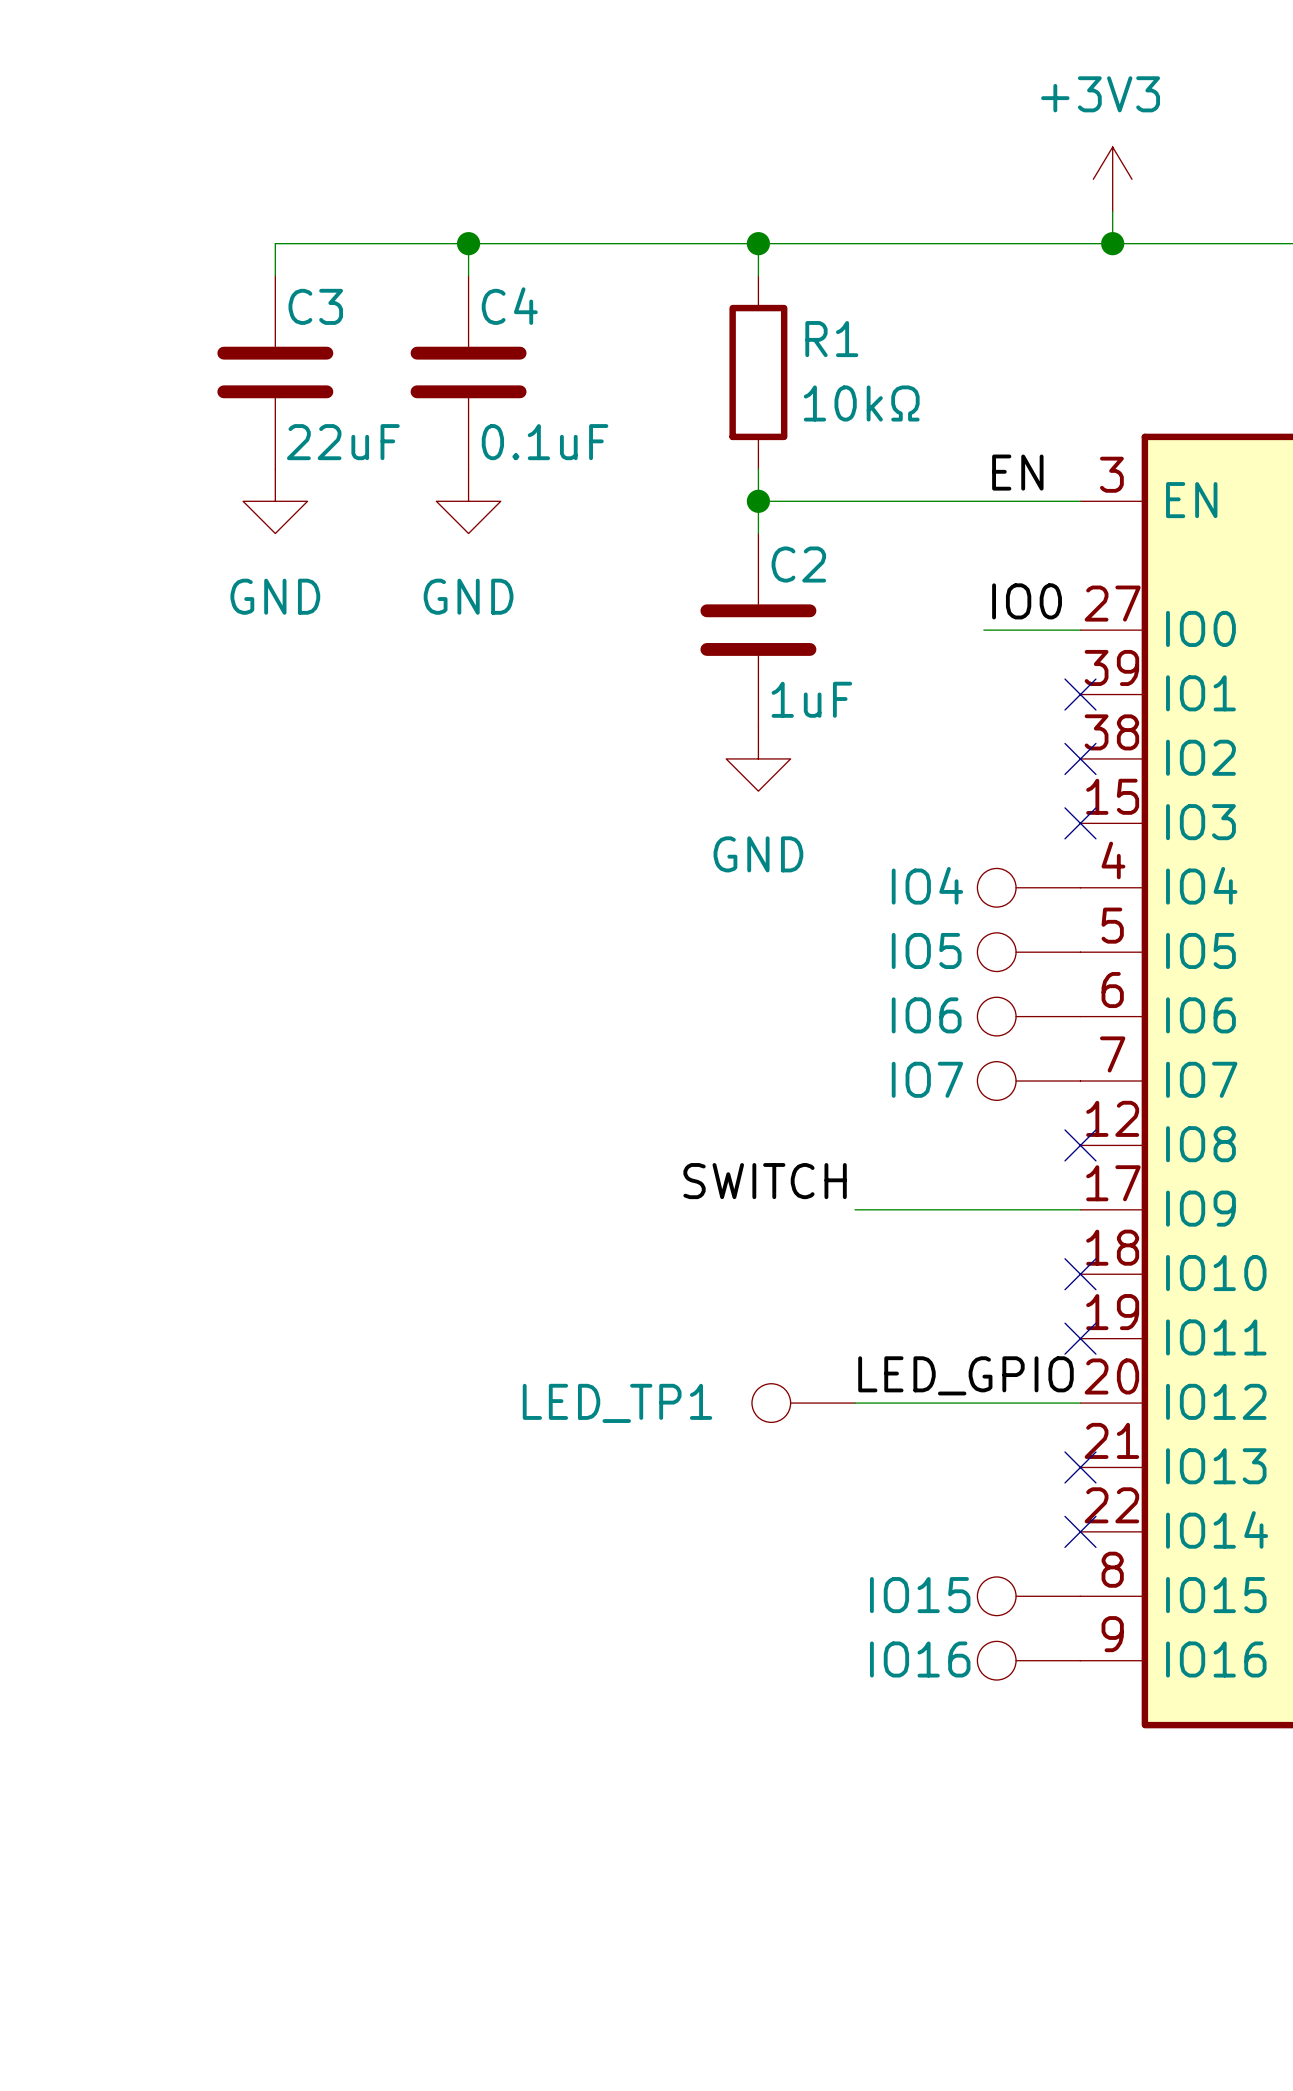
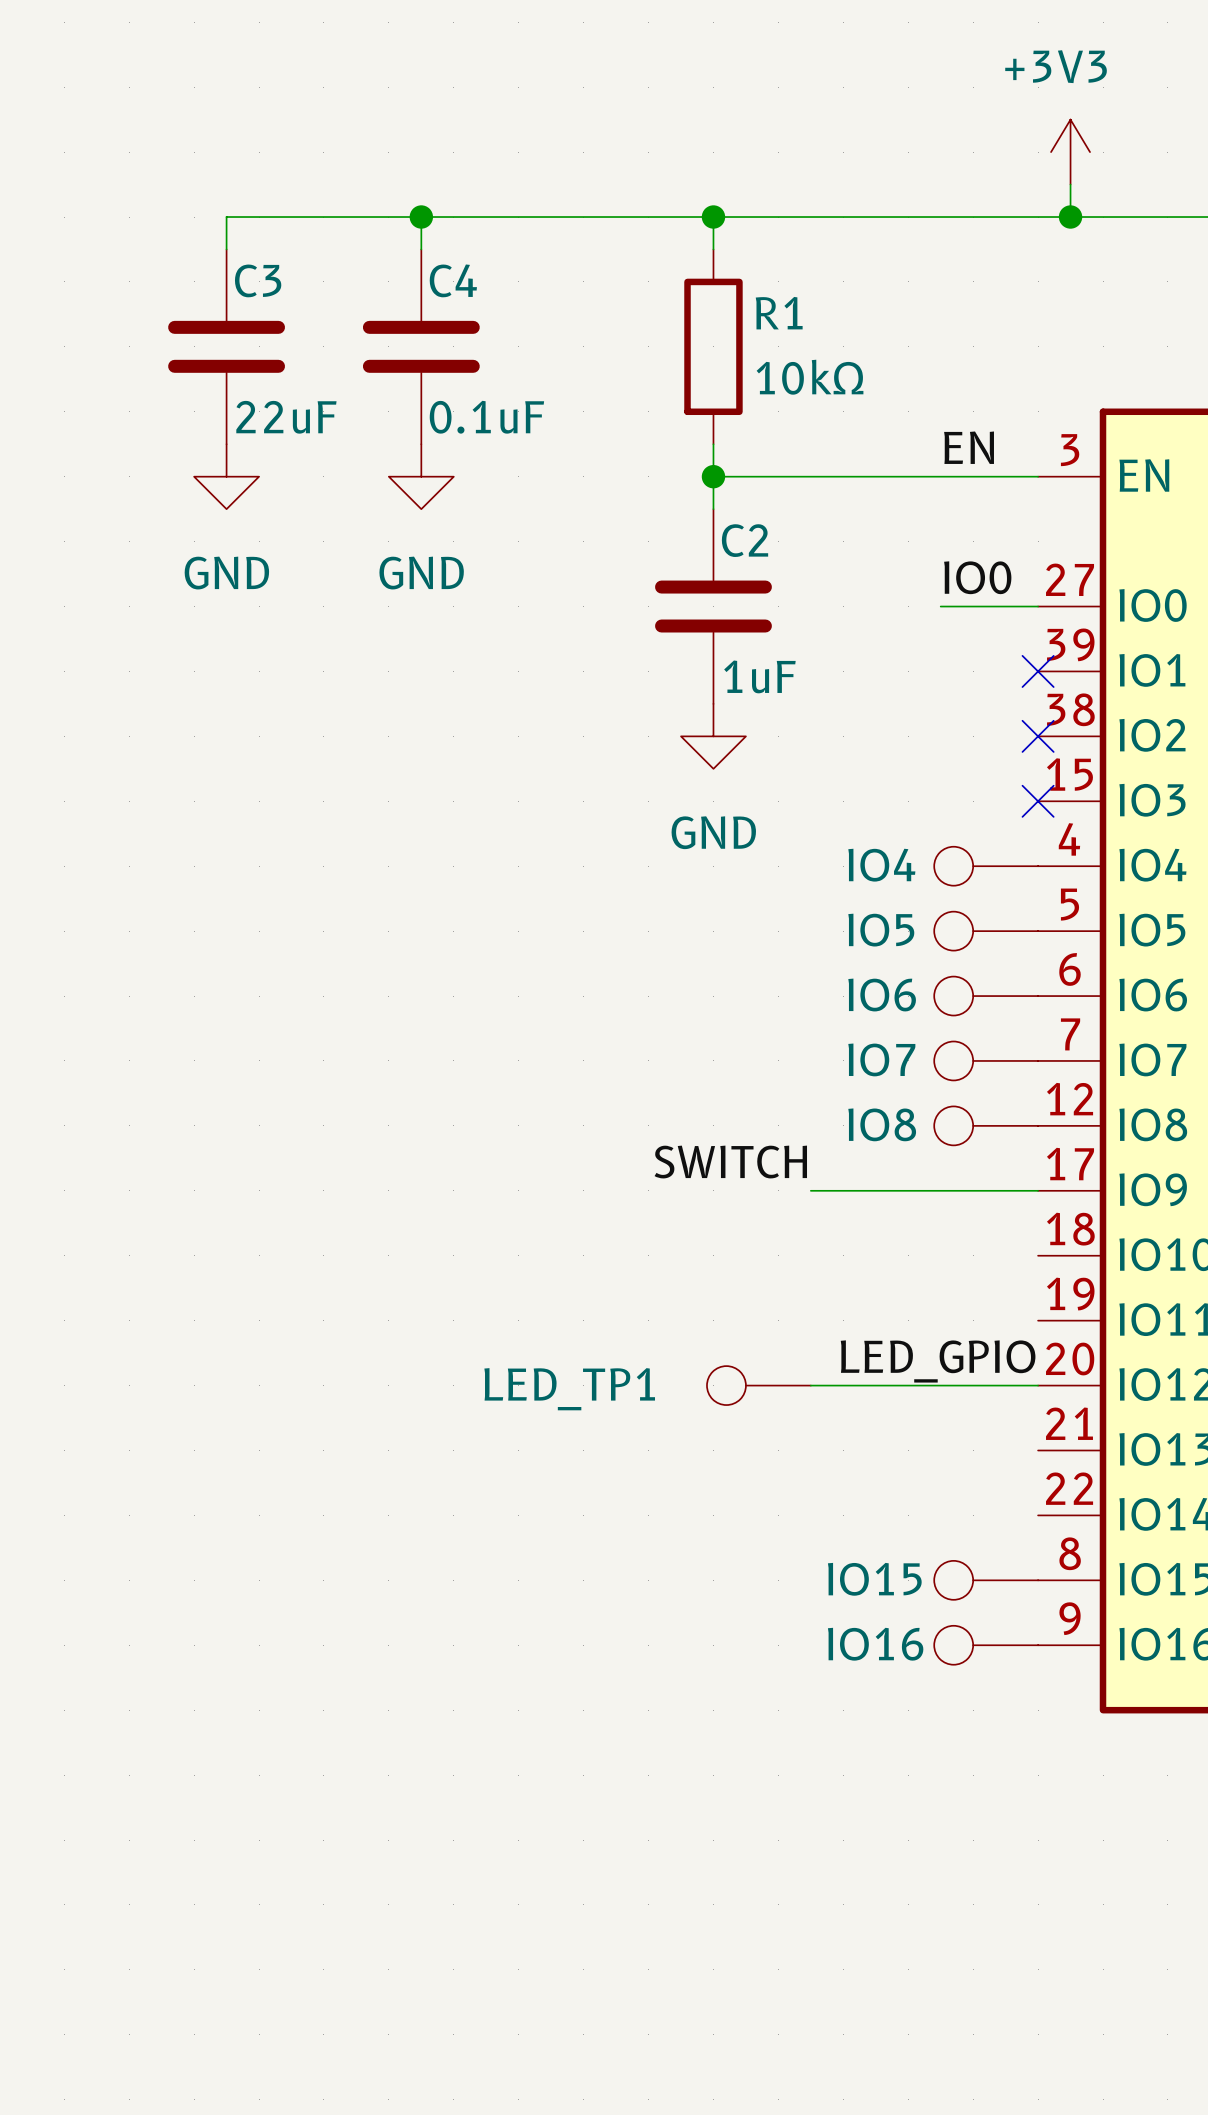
IO8: none -> (986, 1125)
no-connect mark: (1080, 1145) -> none
no-connect mark: (1080, 1274) -> none
no-connect mark: (1080, 1338) -> none
no-connect mark: (1080, 1467) -> none
no-connect mark: (1080, 1531) -> none

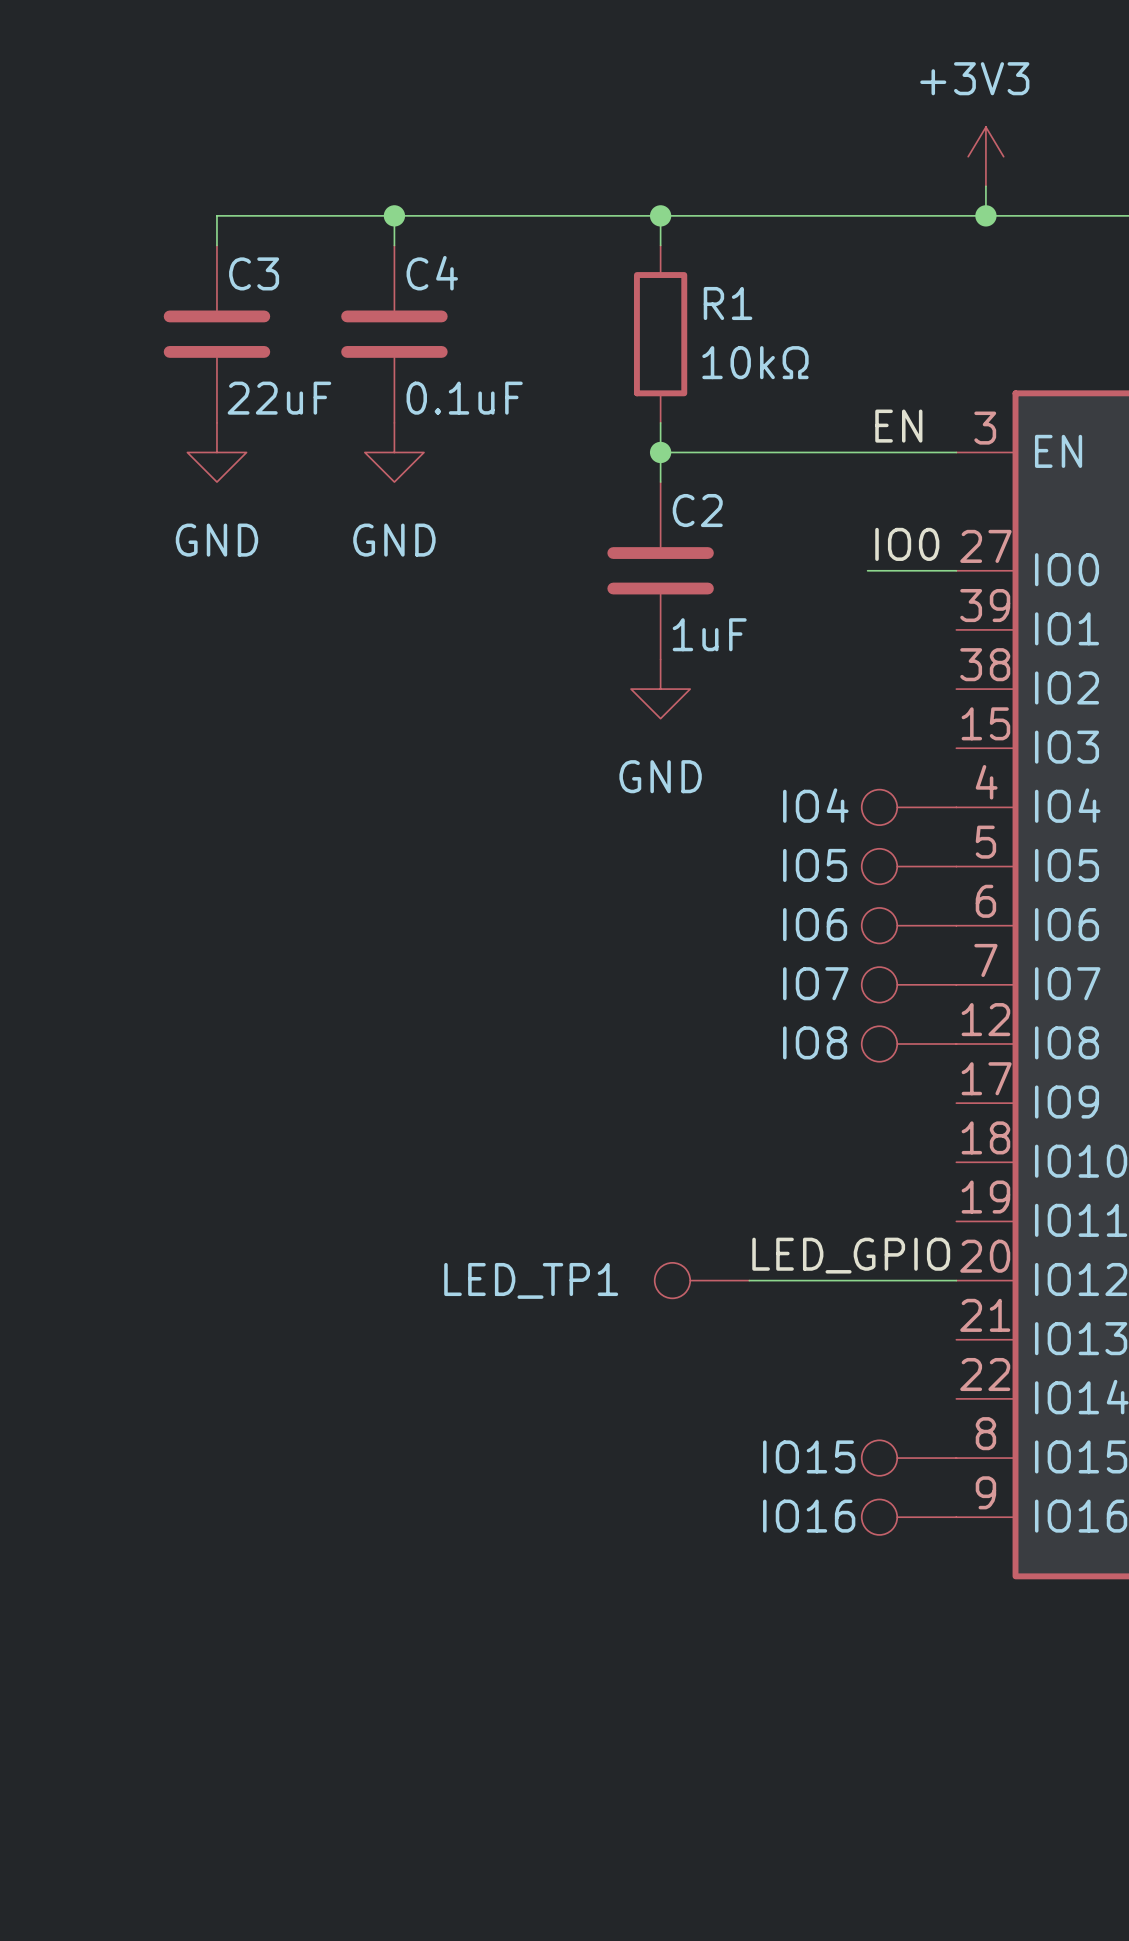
no-connect mark: (1038, 671) -> none
no-connect mark: (1038, 736) -> none
no-connect mark: (1038, 801) -> none
label: SWITCH (730, 1162) -> none
wire: (810, 1190) (1038, 1190) -> none

